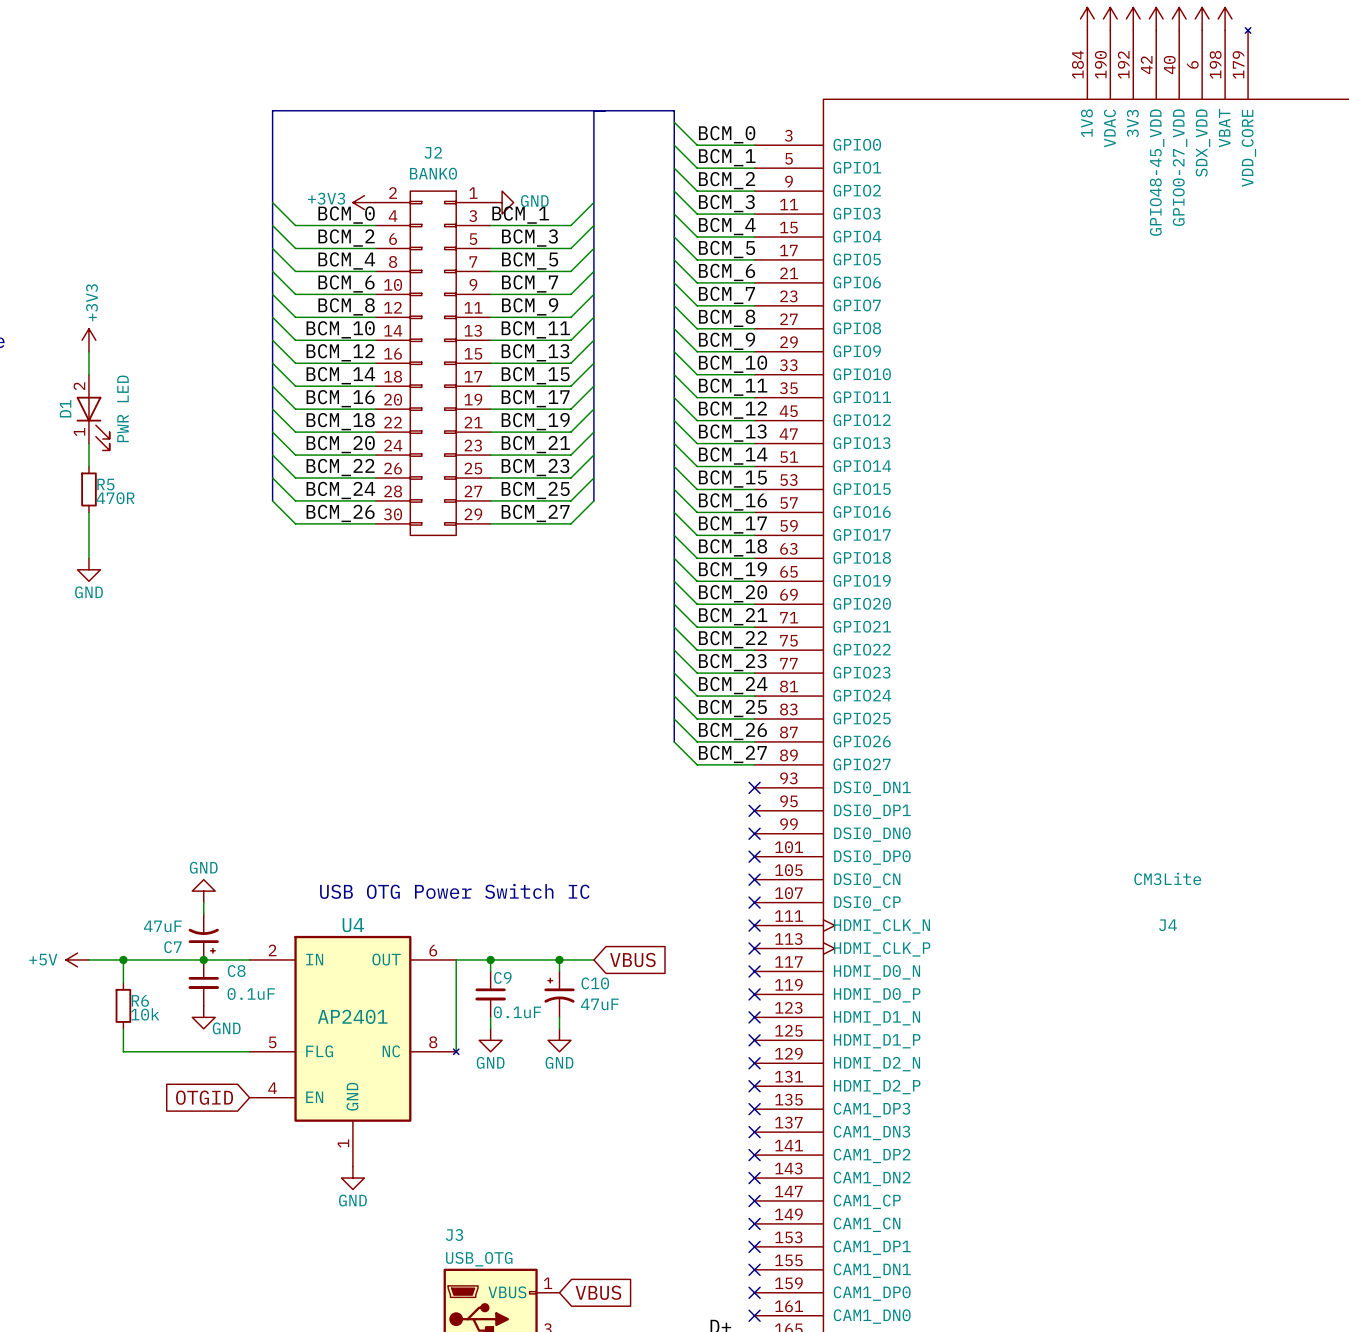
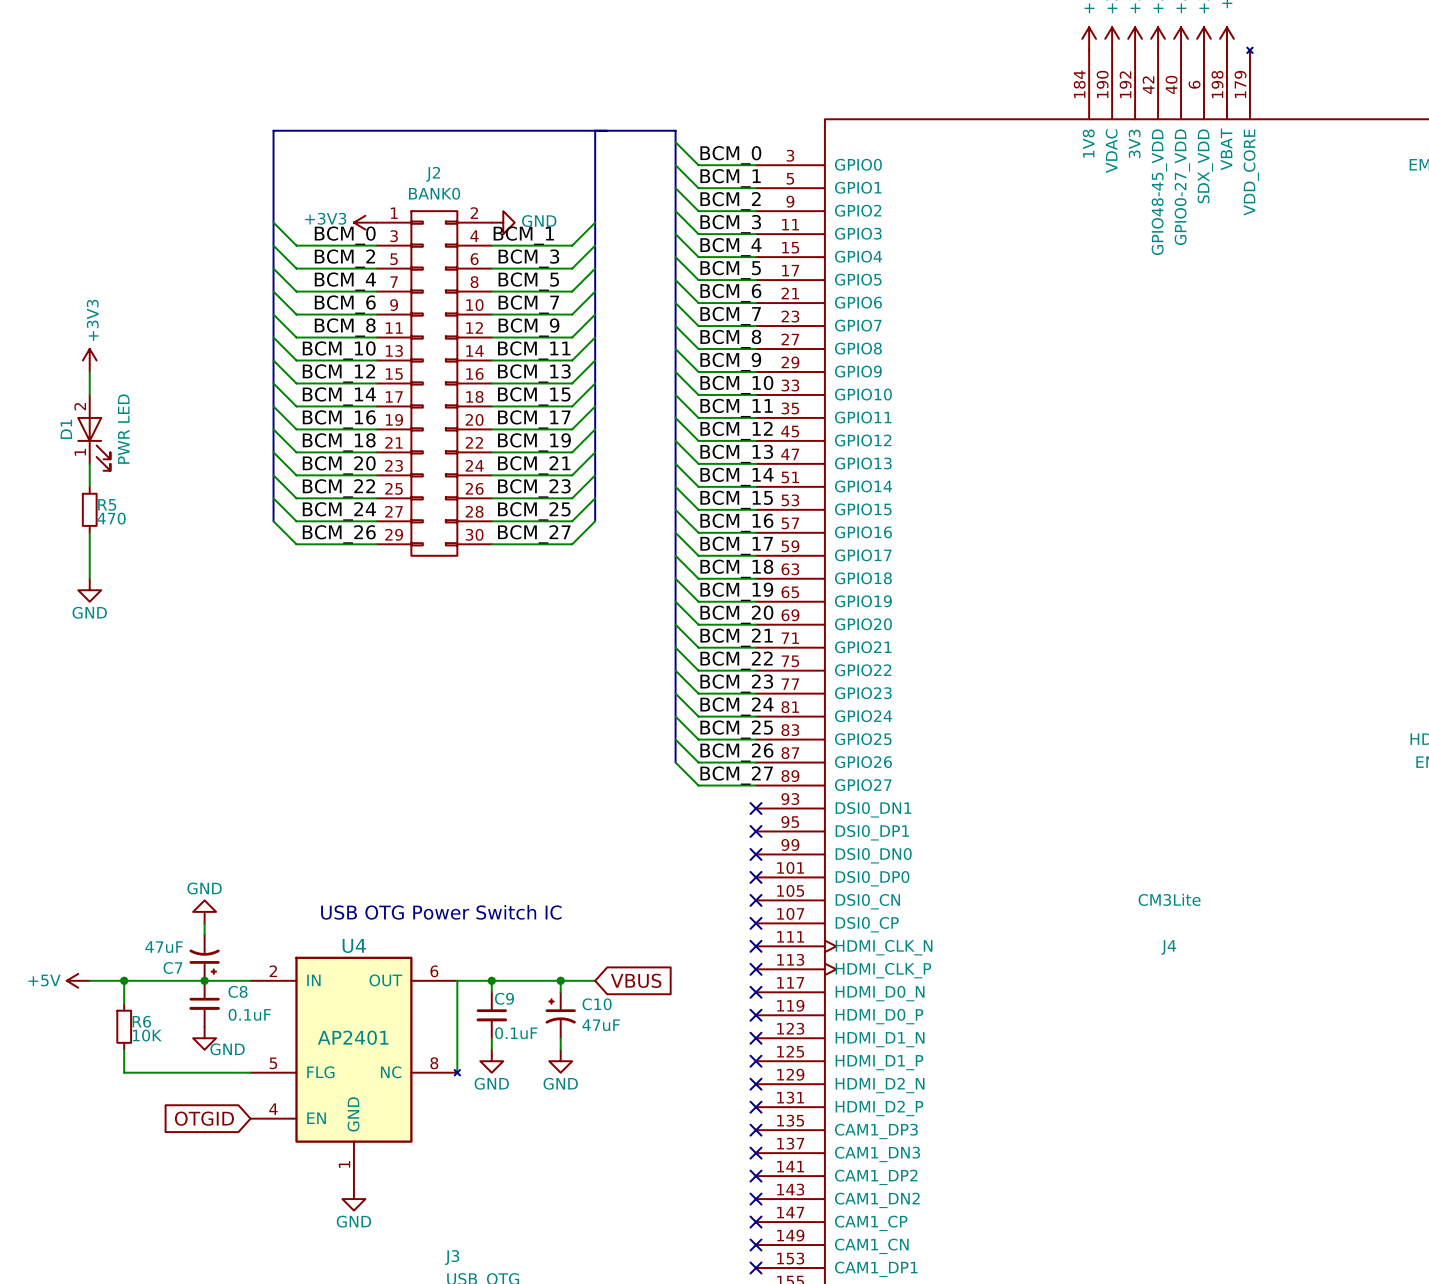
J2 flip: as is (433, 363) -> left-right (434, 383)
R5 value: 470R (115, 498) -> 470 (111, 518)
R6 value: 10k (145, 1014) -> 10K (147, 1035)

